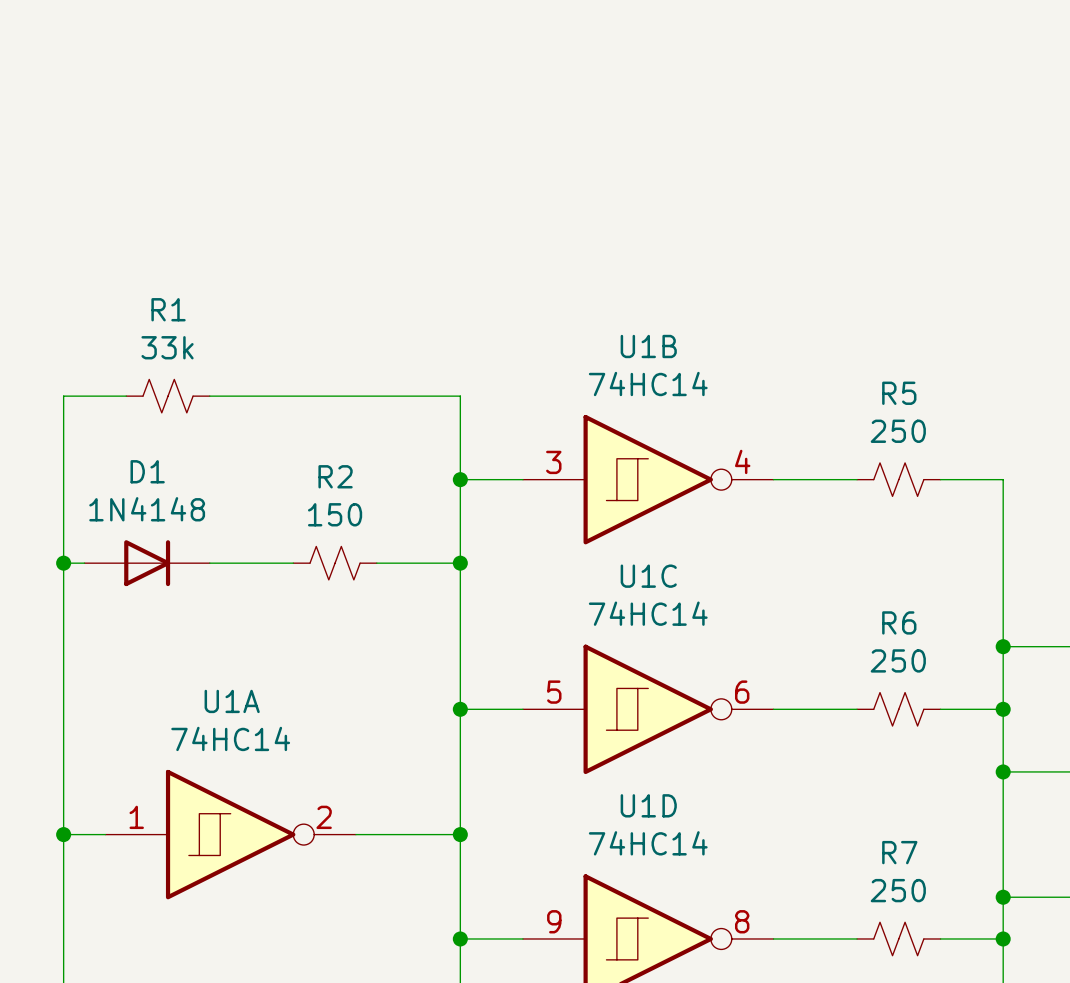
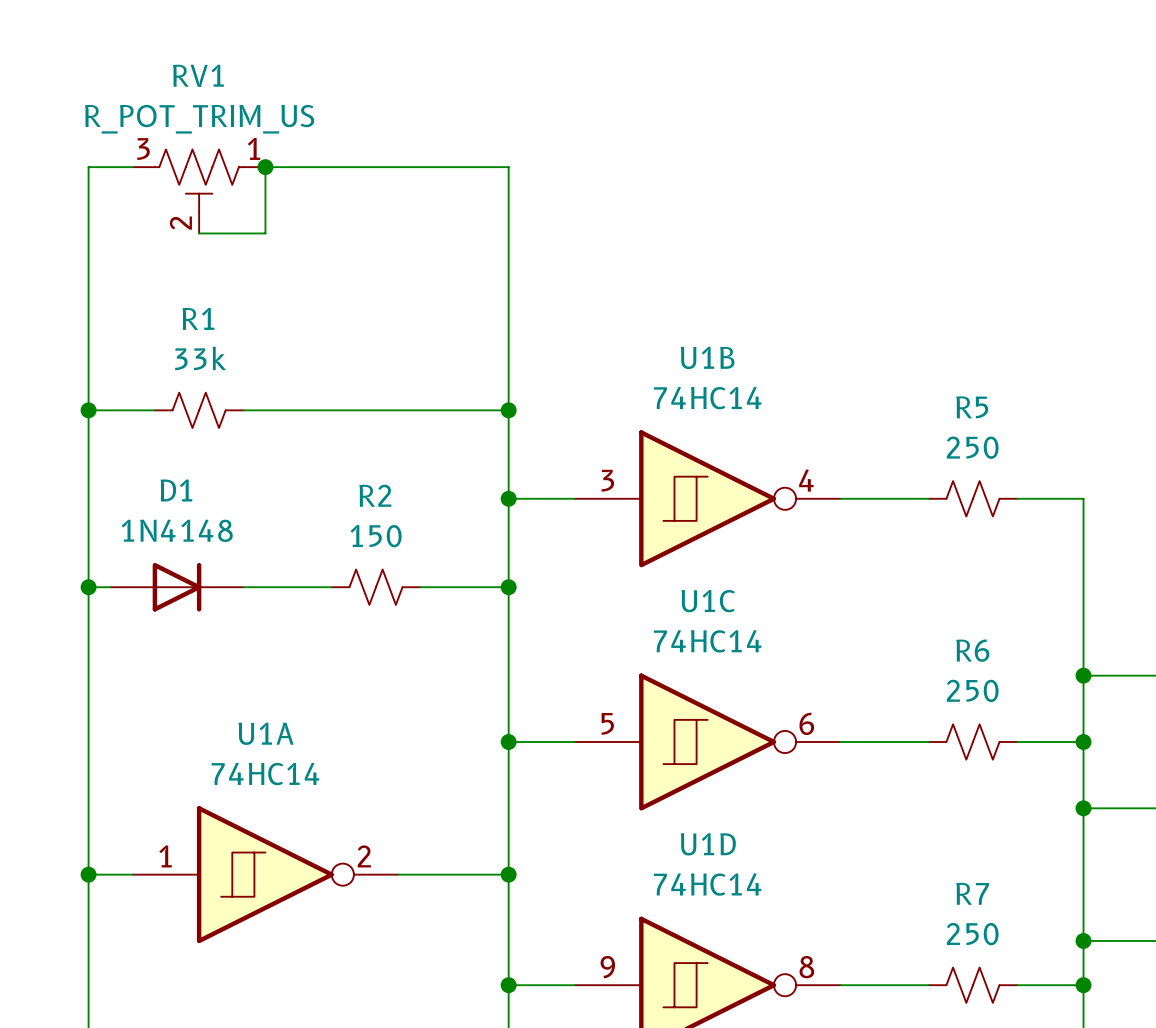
wire: none -> (132, 167) (88, 167) (88, 410)
junction: none -> (265, 167)
RV1: none -> R_POT_TRIM_US (199, 191)
wire: none -> (199, 233) (265, 233) (265, 167) (508, 167) (508, 410)
junction: none -> (88, 410)
junction: none -> (508, 410)

